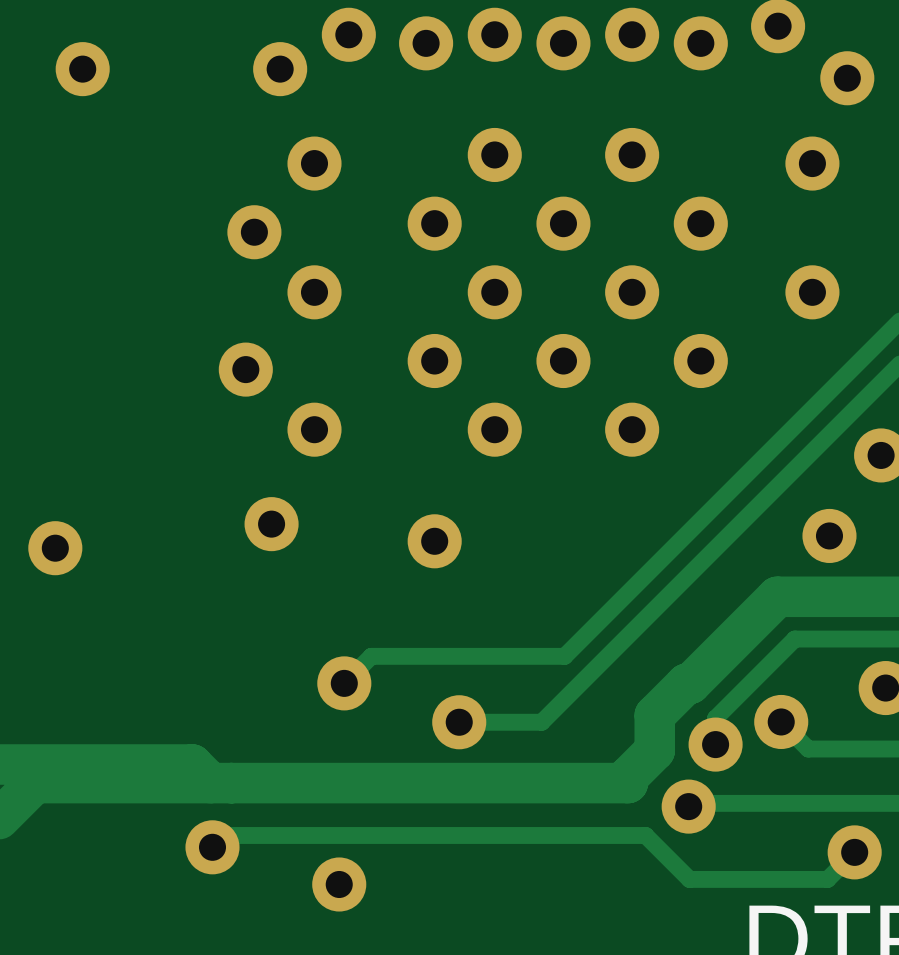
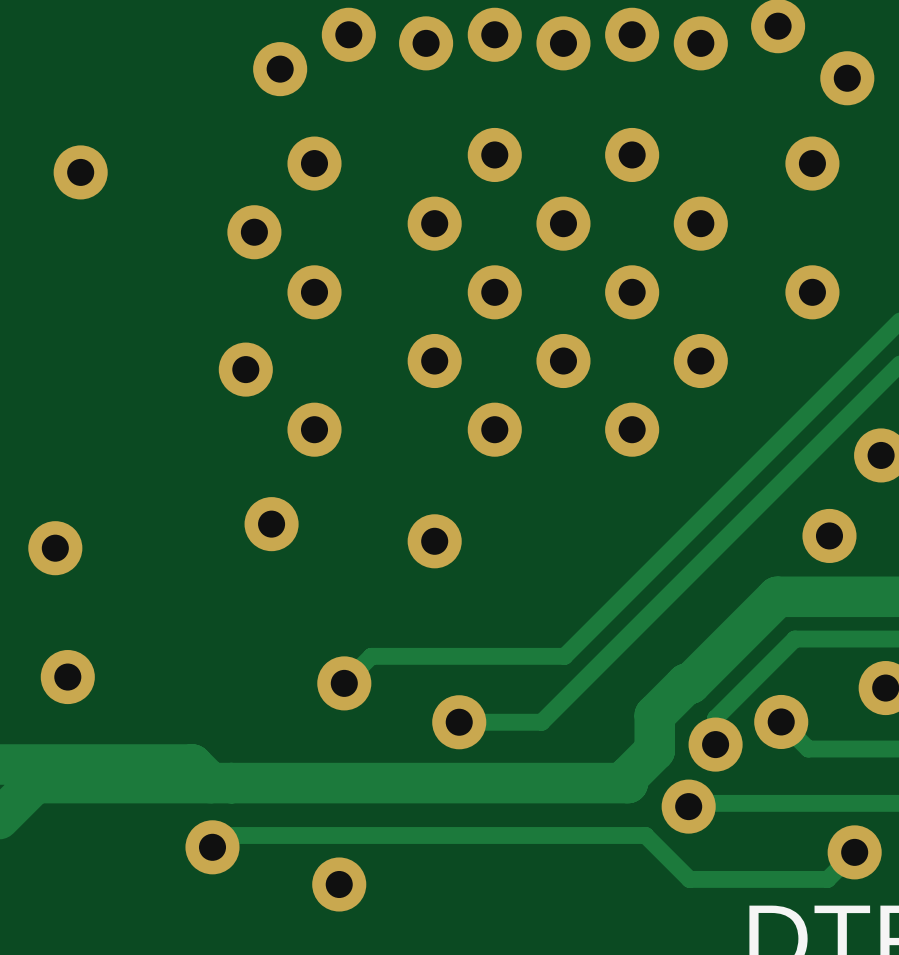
via: (82, 69) -> none
via: none -> (80, 172)
via: none -> (67, 677)

